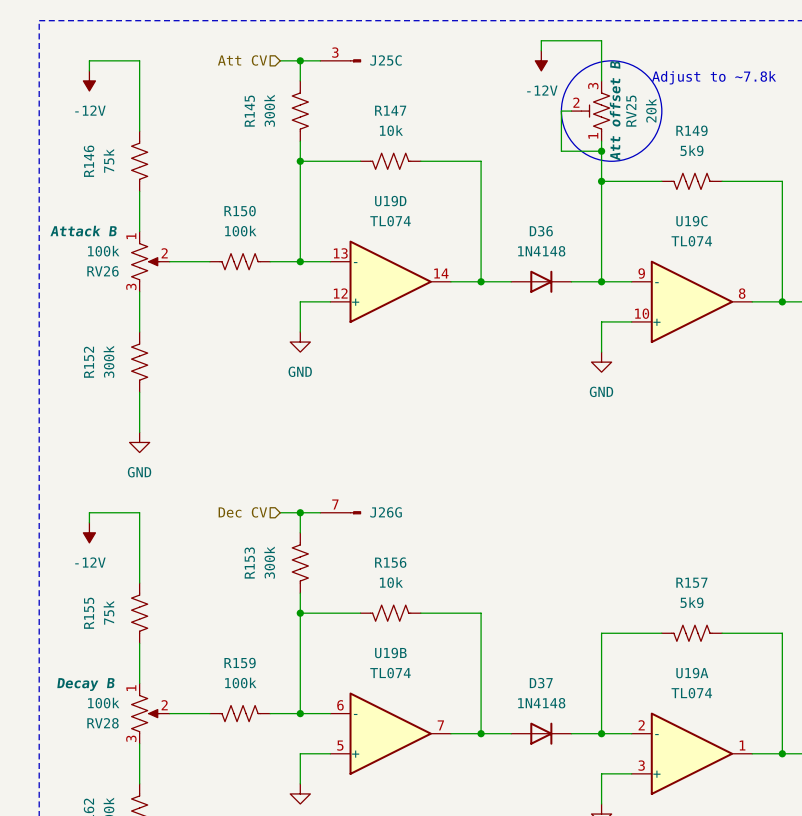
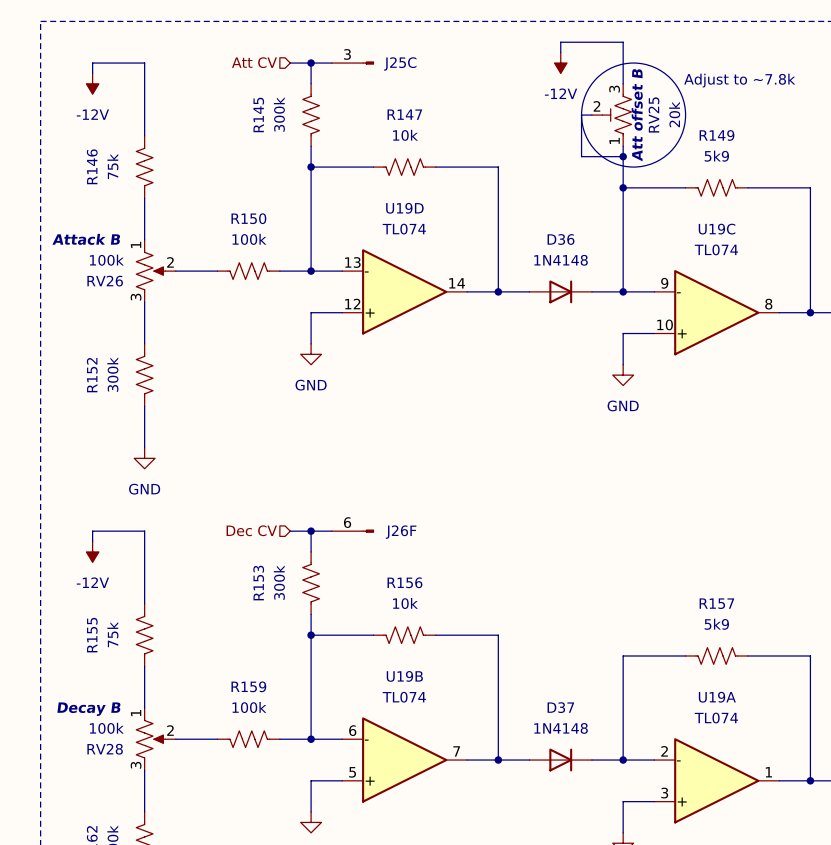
J26G pin number: 7 (335, 504) -> 6 (347, 522)
J26G name: J26G (386, 512) -> J26F (401, 532)

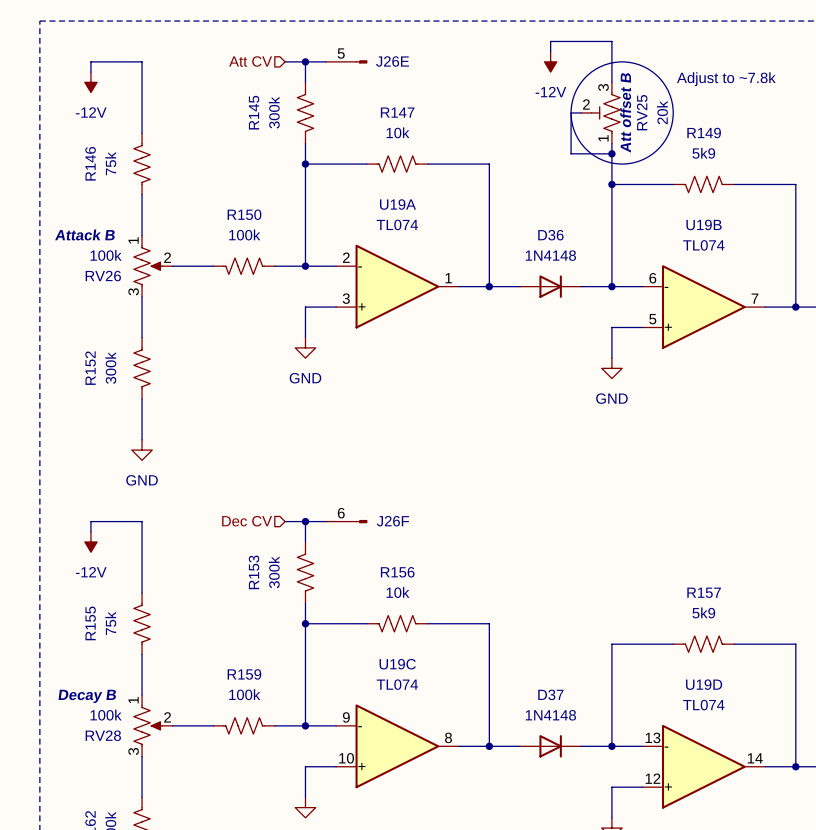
J25C pin number: 3 (347, 54) -> 5 (341, 53)
J25C name: J25C (400, 63) -> J26E (392, 61)
U19D position: (404, 291) -> (703, 766)
U19C position: (716, 312) -> (397, 746)
U19B position: (404, 760) -> (703, 307)
U19A position: (716, 780) -> (397, 286)

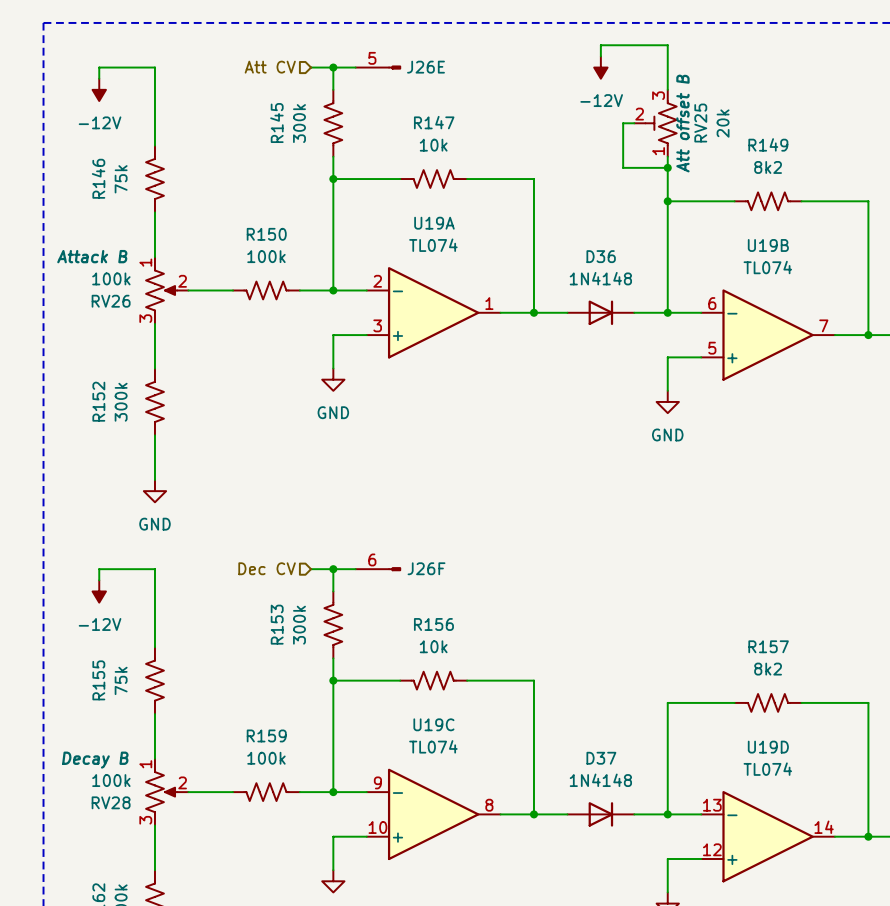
drawing: [571, 61, 674, 165] -> none
text: Adjust to ~7.8k (726, 79) -> none
R149 value: 5k9 (703, 153) -> 8k2 (768, 167)
R157 value: 5k9 (703, 612) -> 8k2 (768, 669)

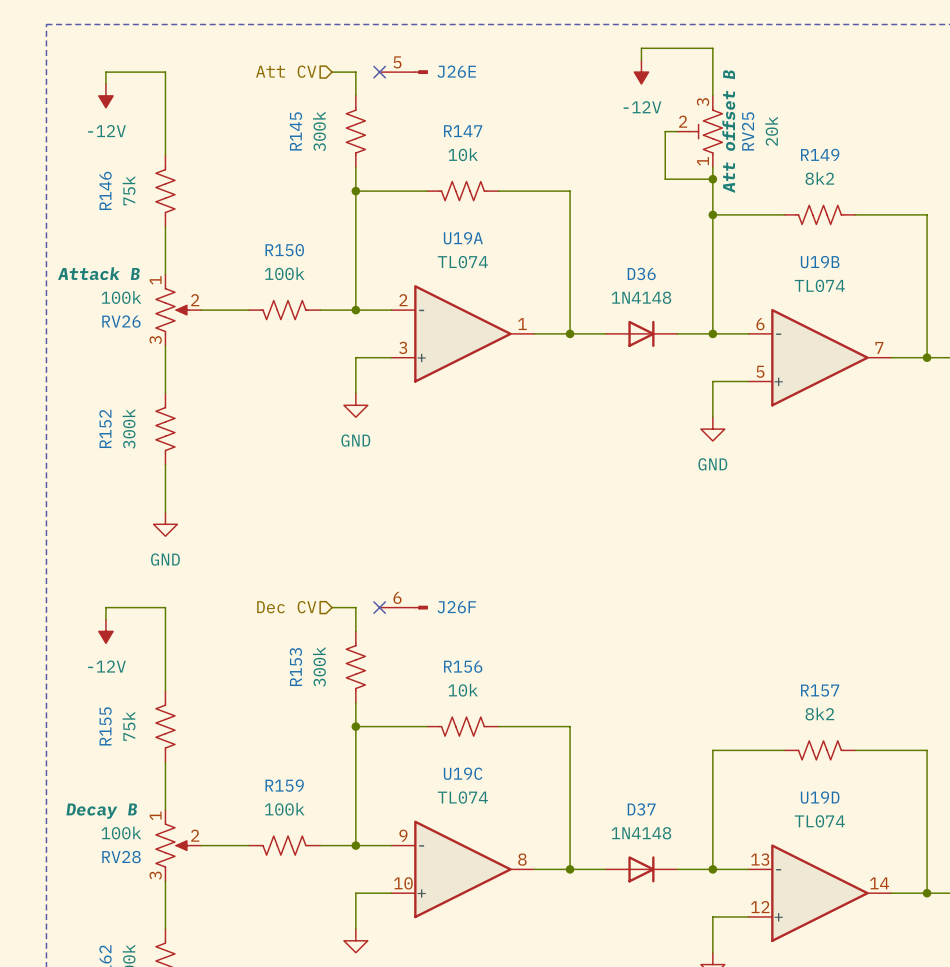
wire: (333, 67) (355, 67) -> none
junction: (333, 67) -> none
no-connect mark: none -> (379, 72)
wire: (333, 569) (355, 569) -> none
junction: (333, 569) -> none
no-connect mark: none -> (379, 607)

